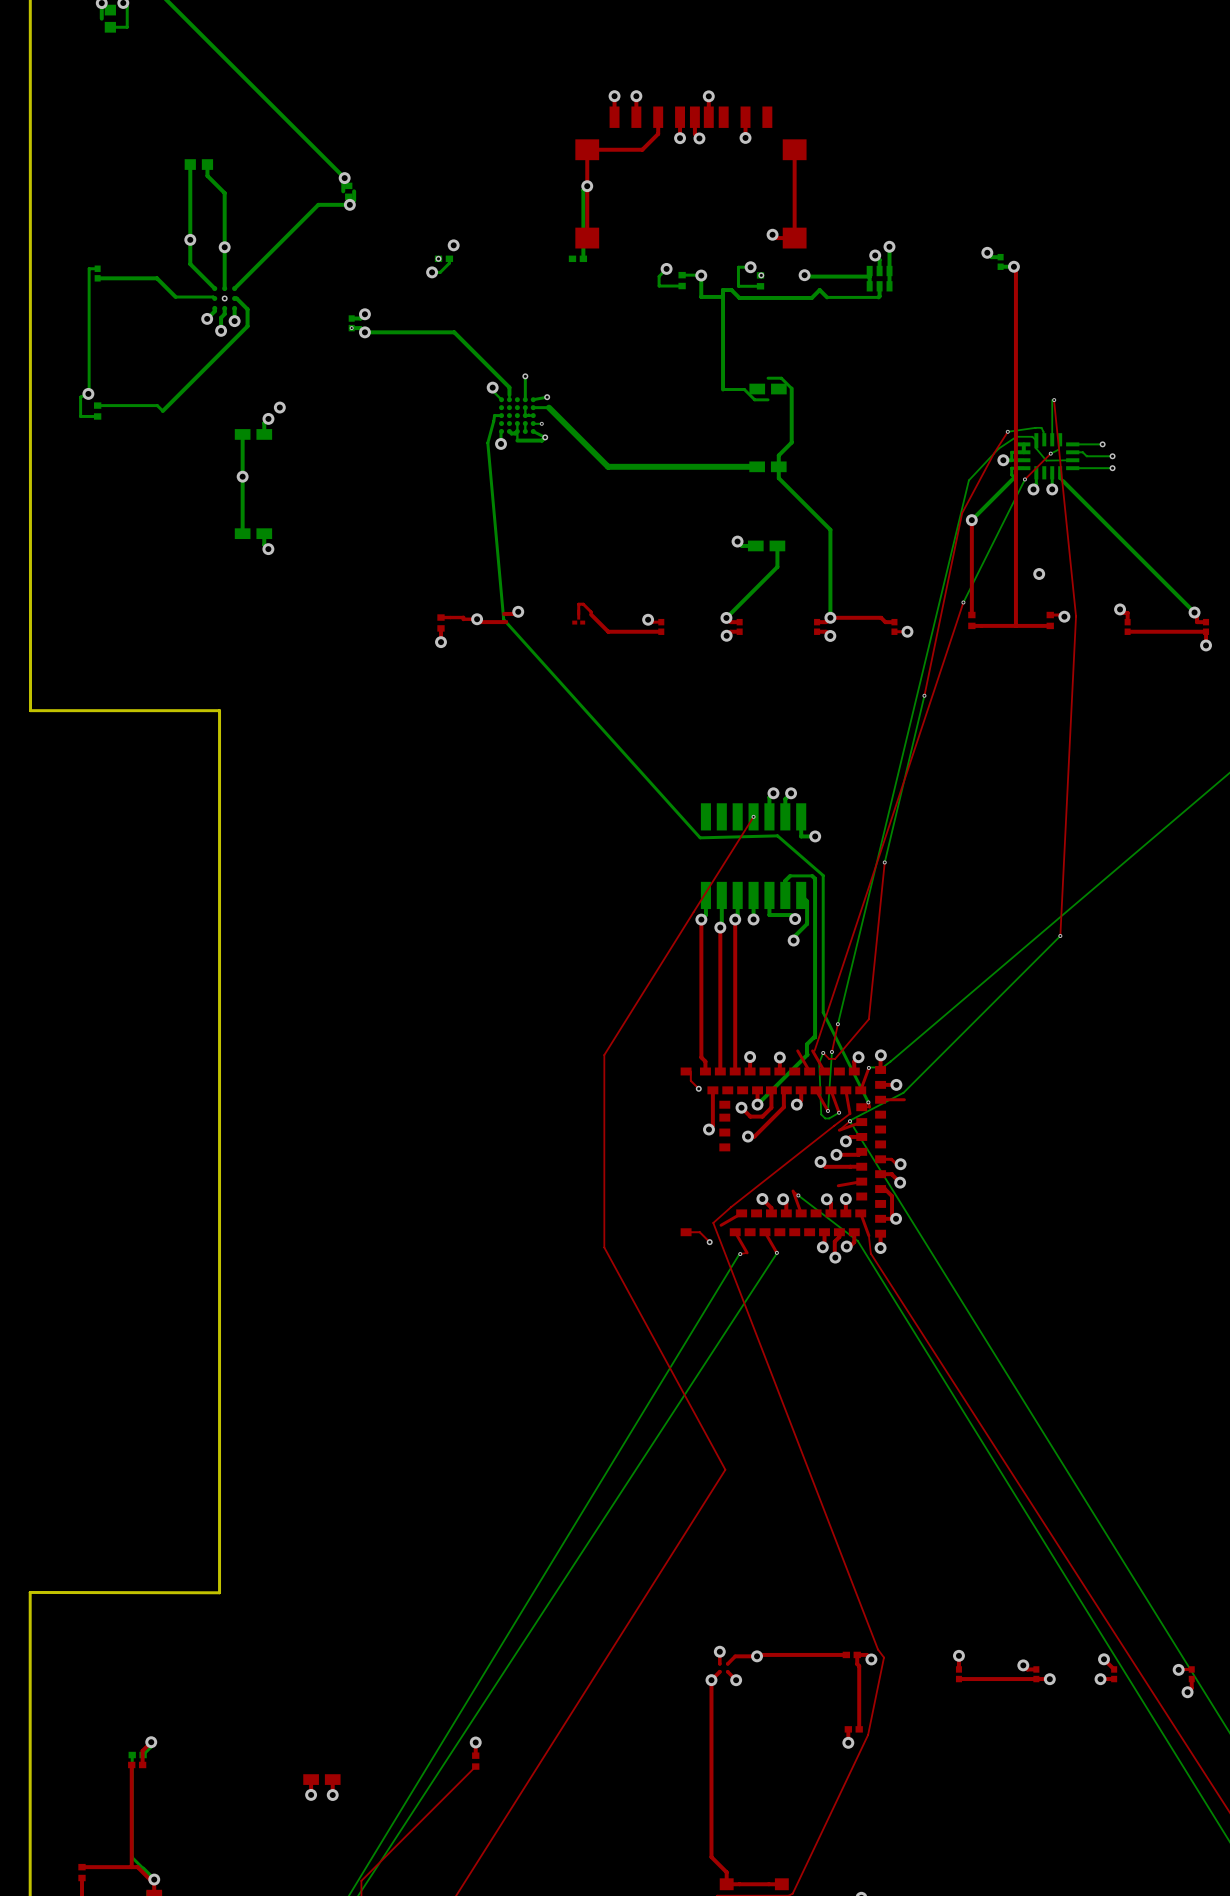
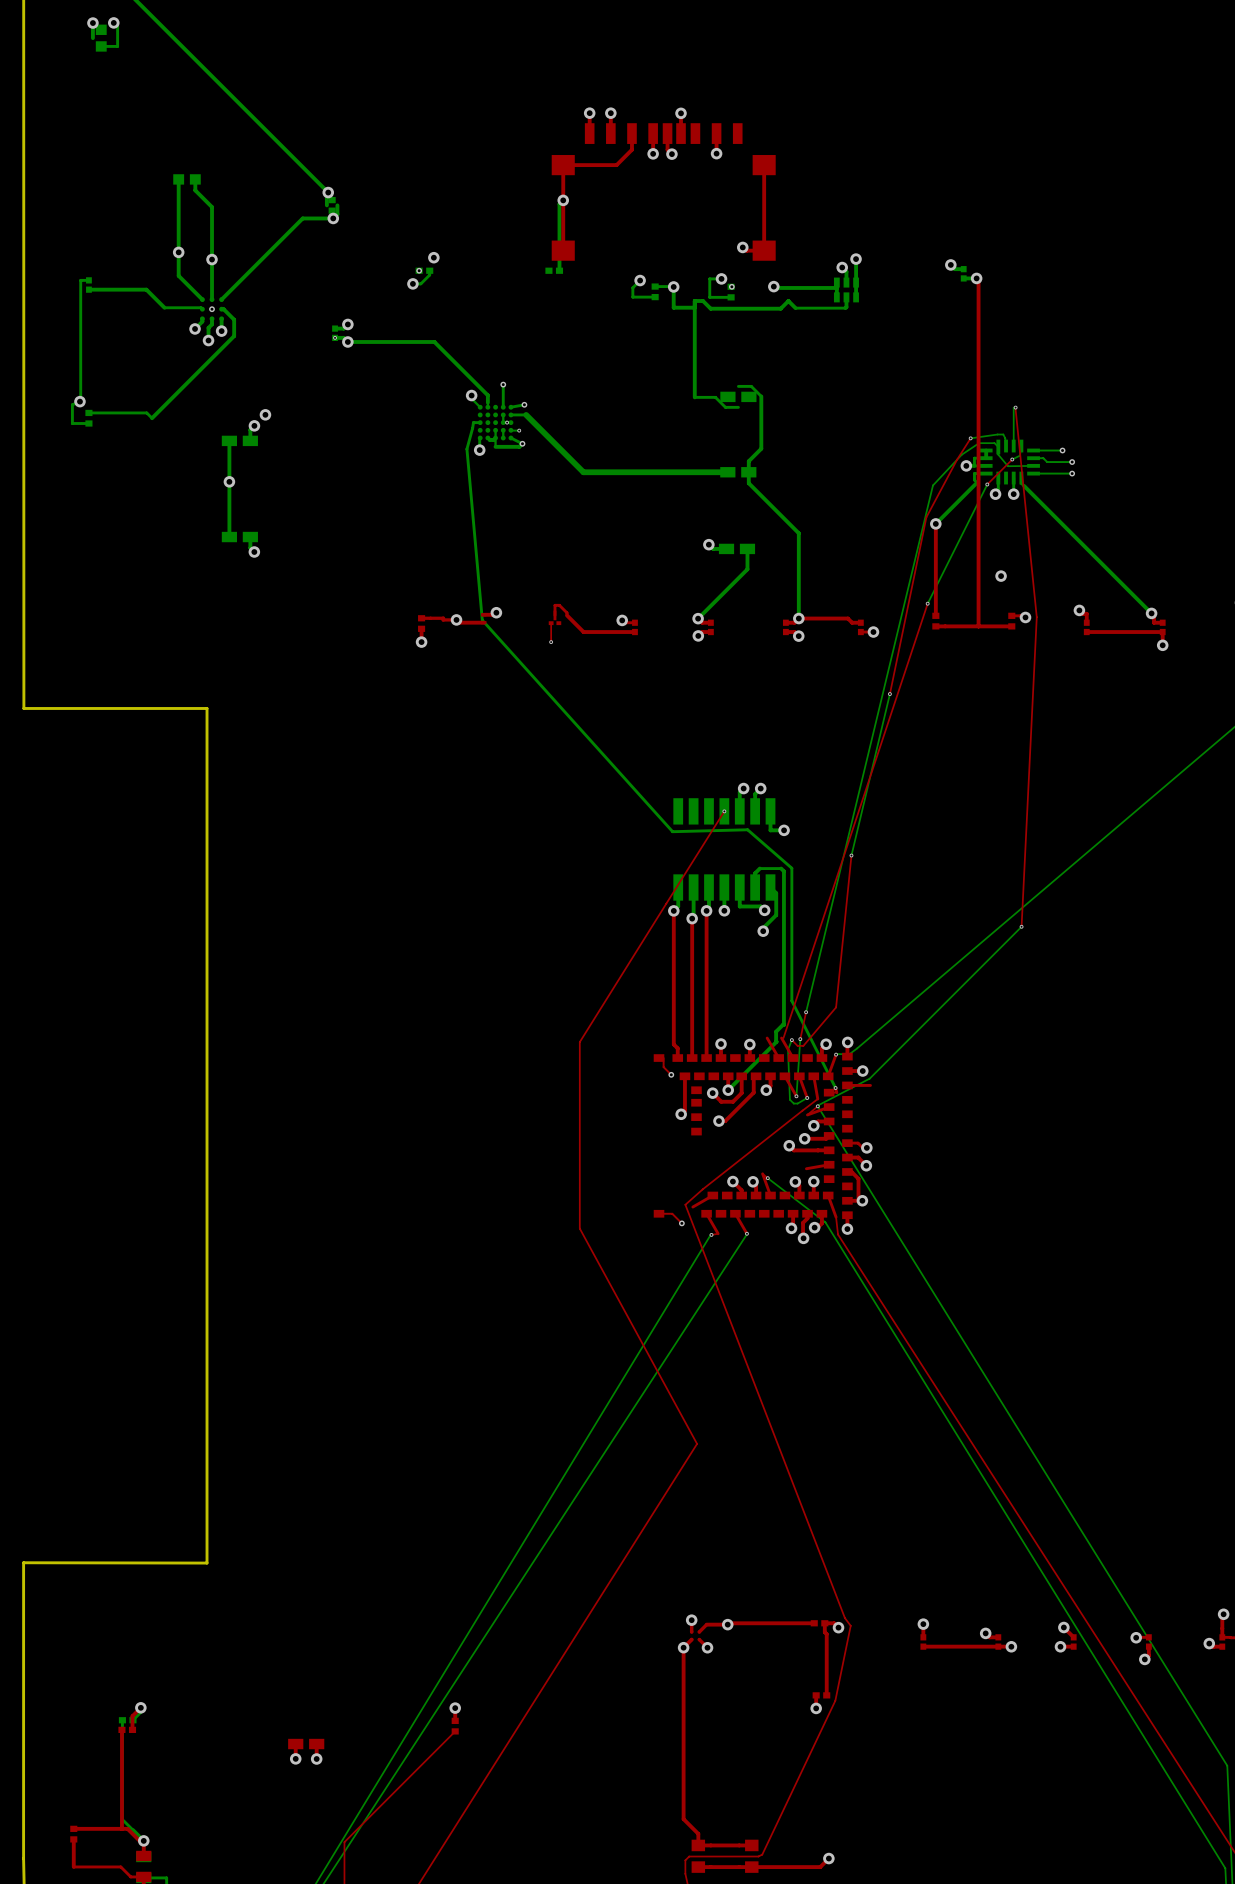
via: none -> (507, 422)
top track: none -> (551, 623) (551, 642)
via: none -> (551, 642)

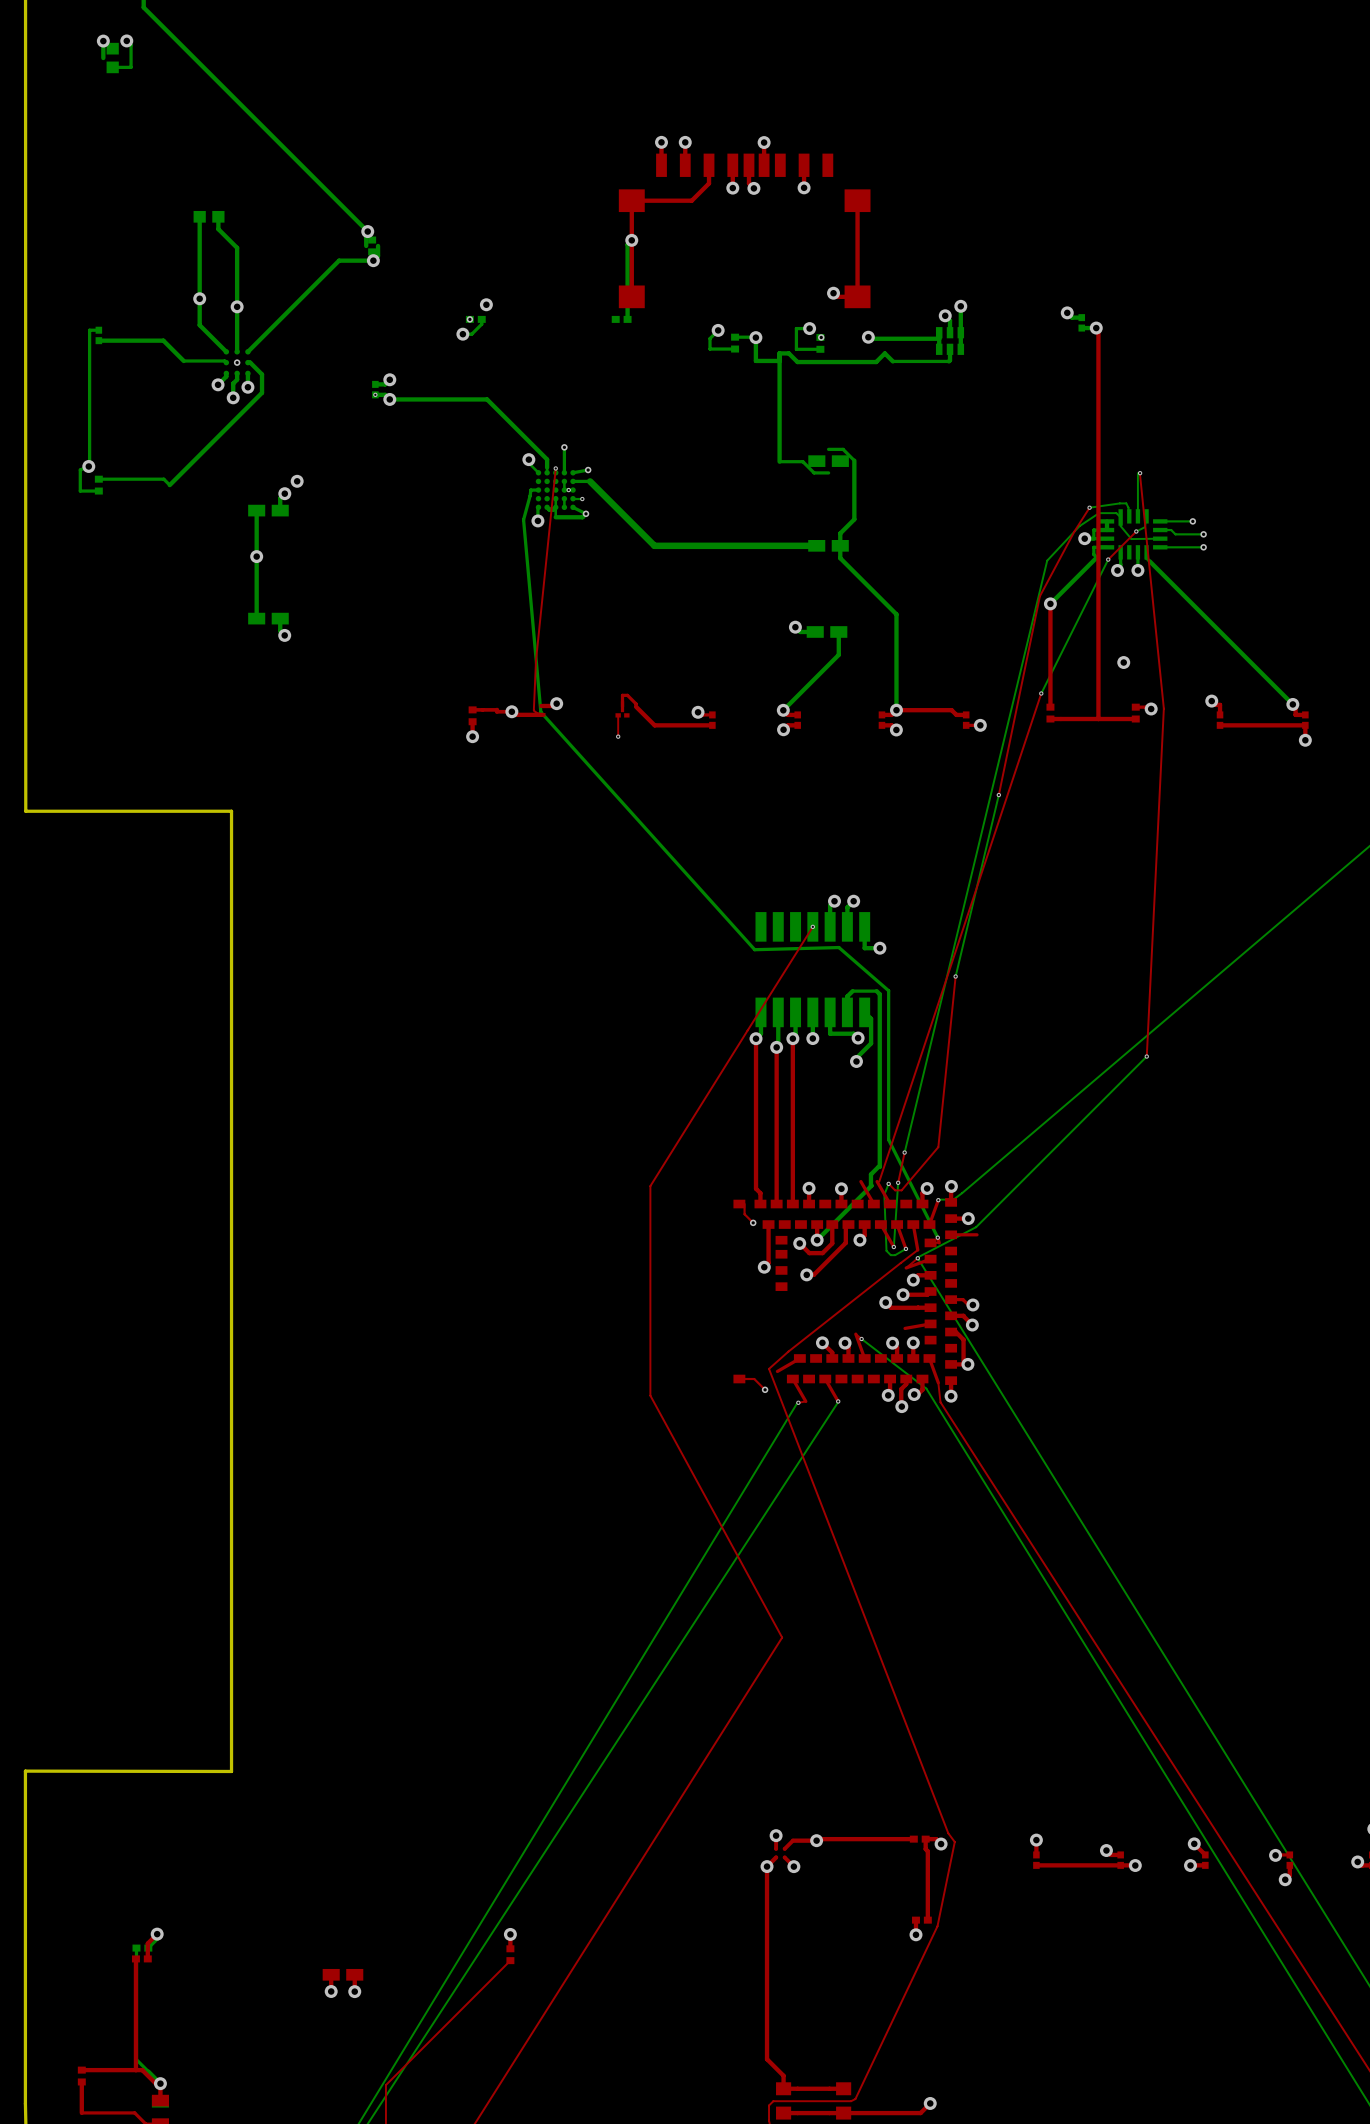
top track: none -> (555, 468) (535, 660) (533, 710) (542, 714)
via: none -> (555, 468)

